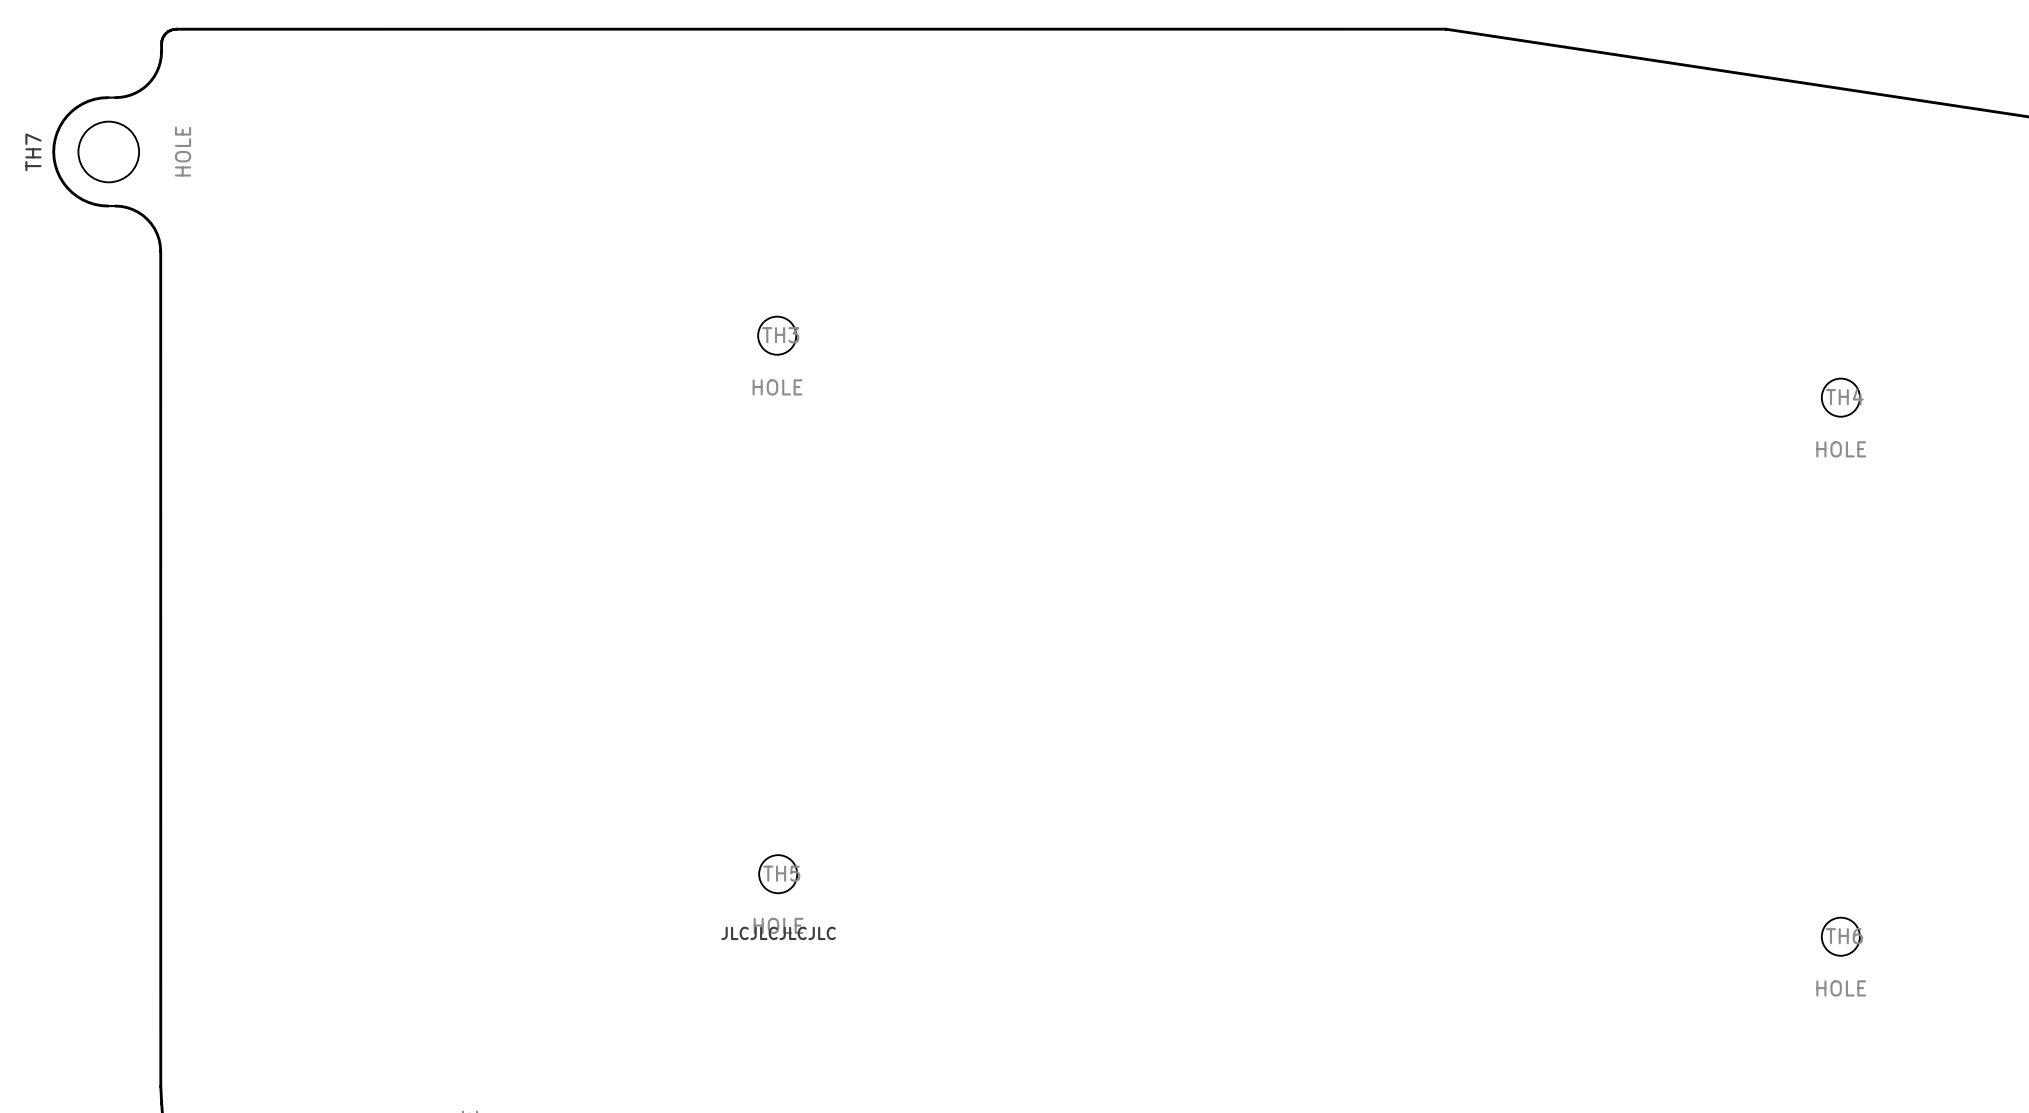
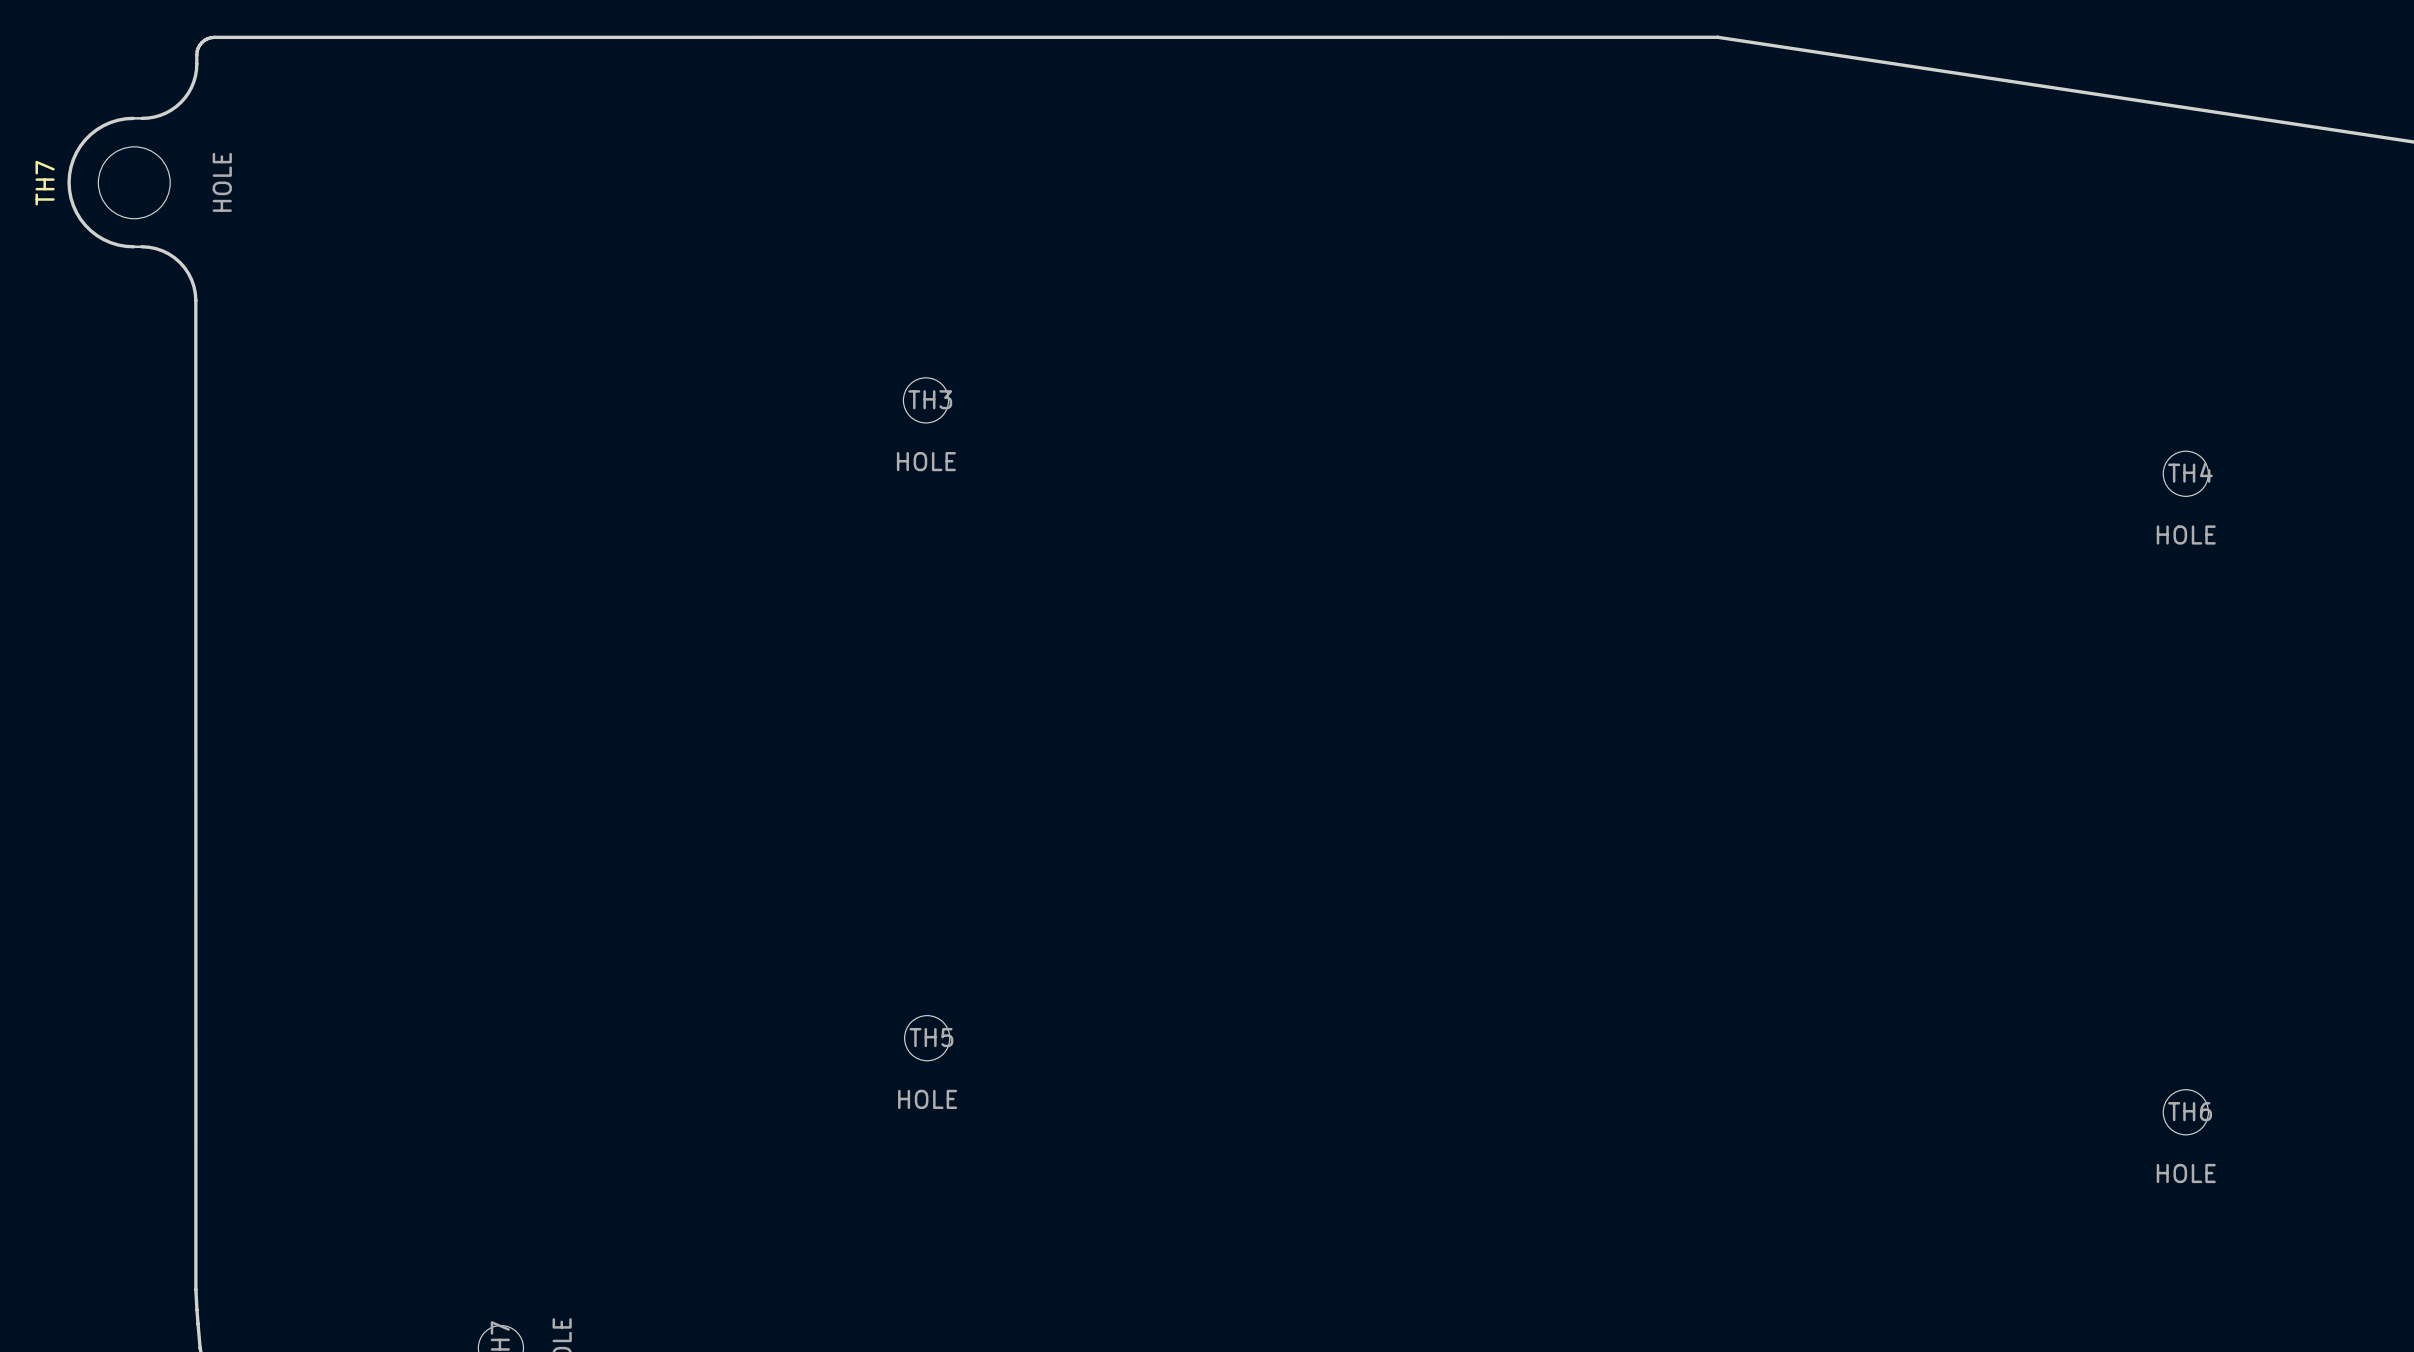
text: JLCJLCJLCJLC (778, 933) -> none

